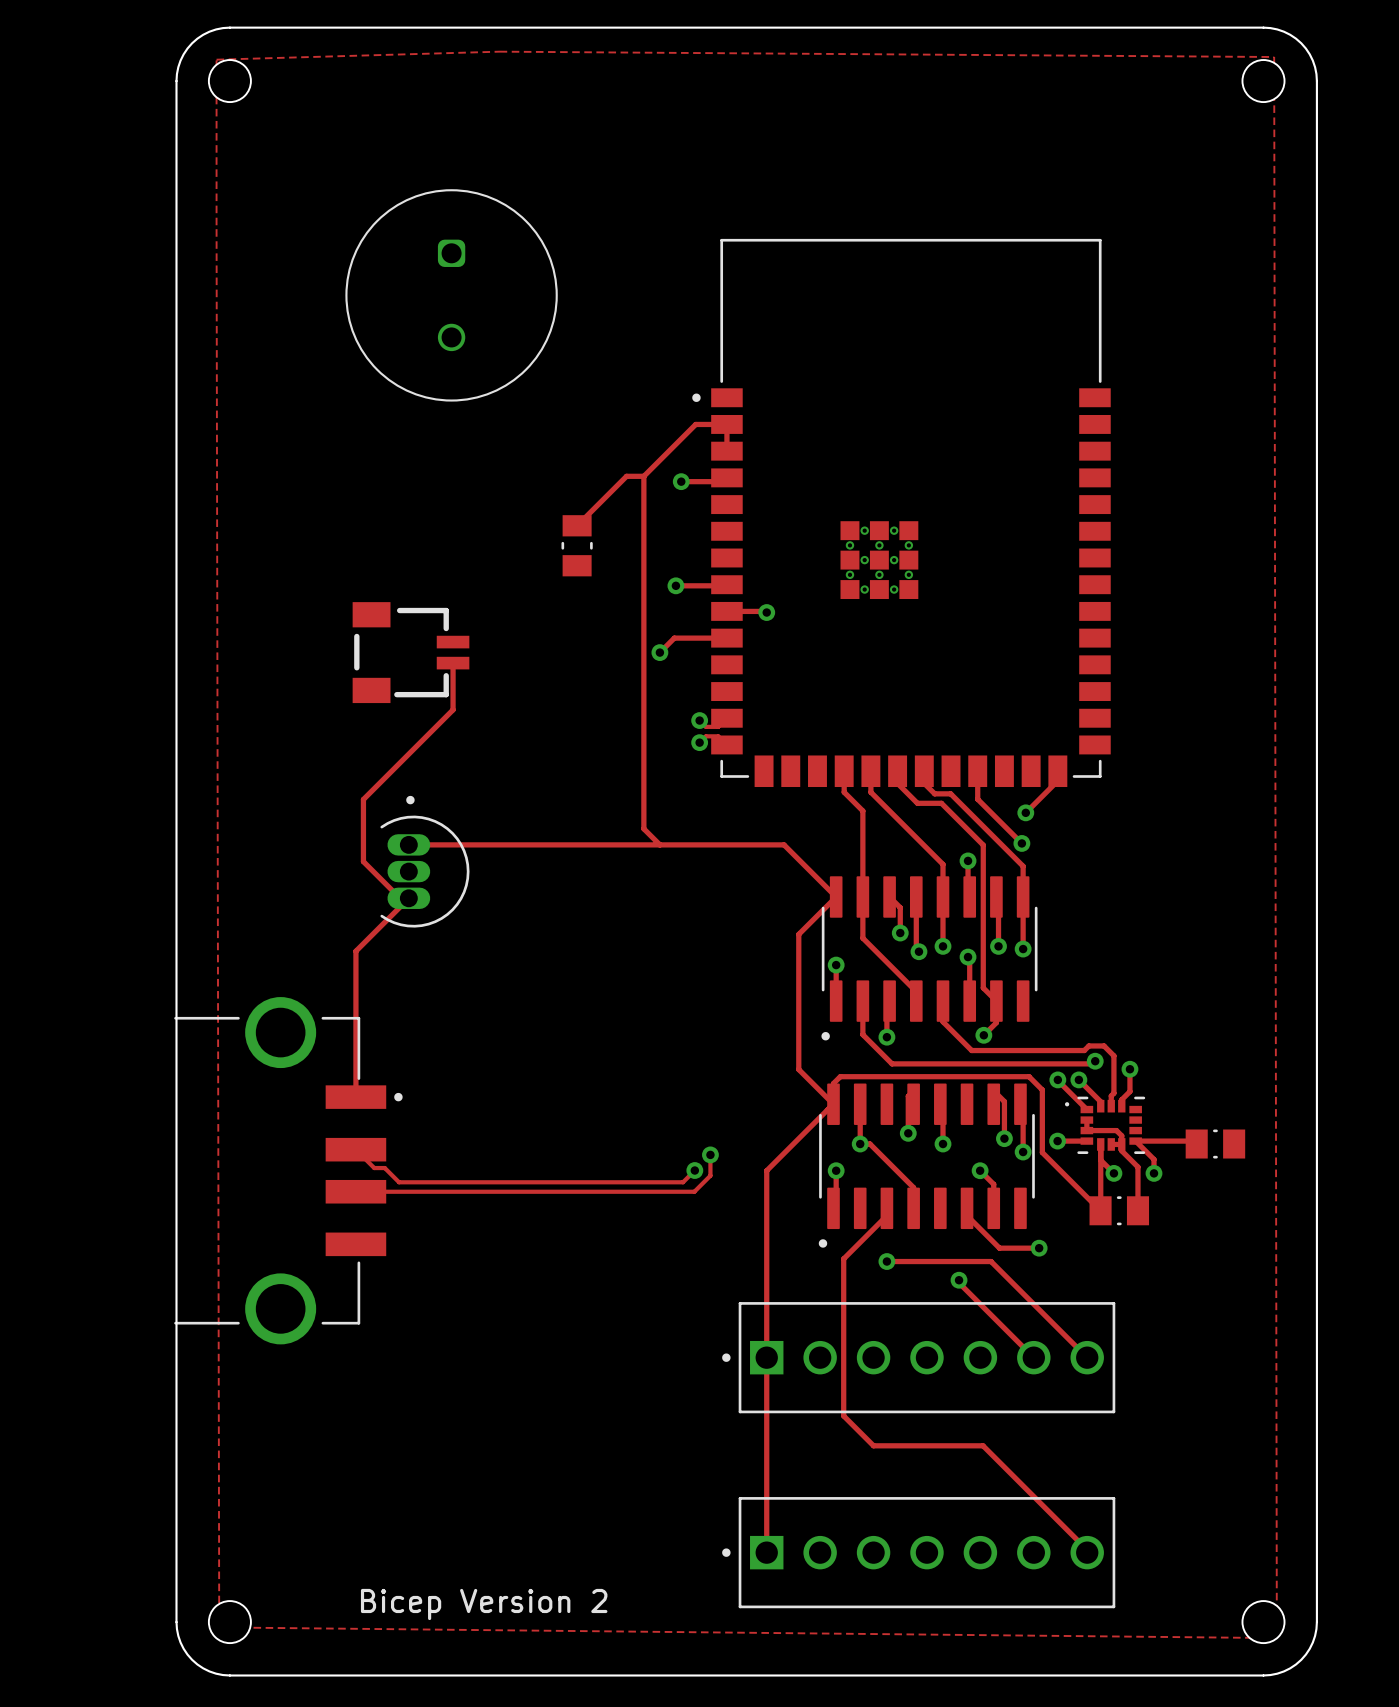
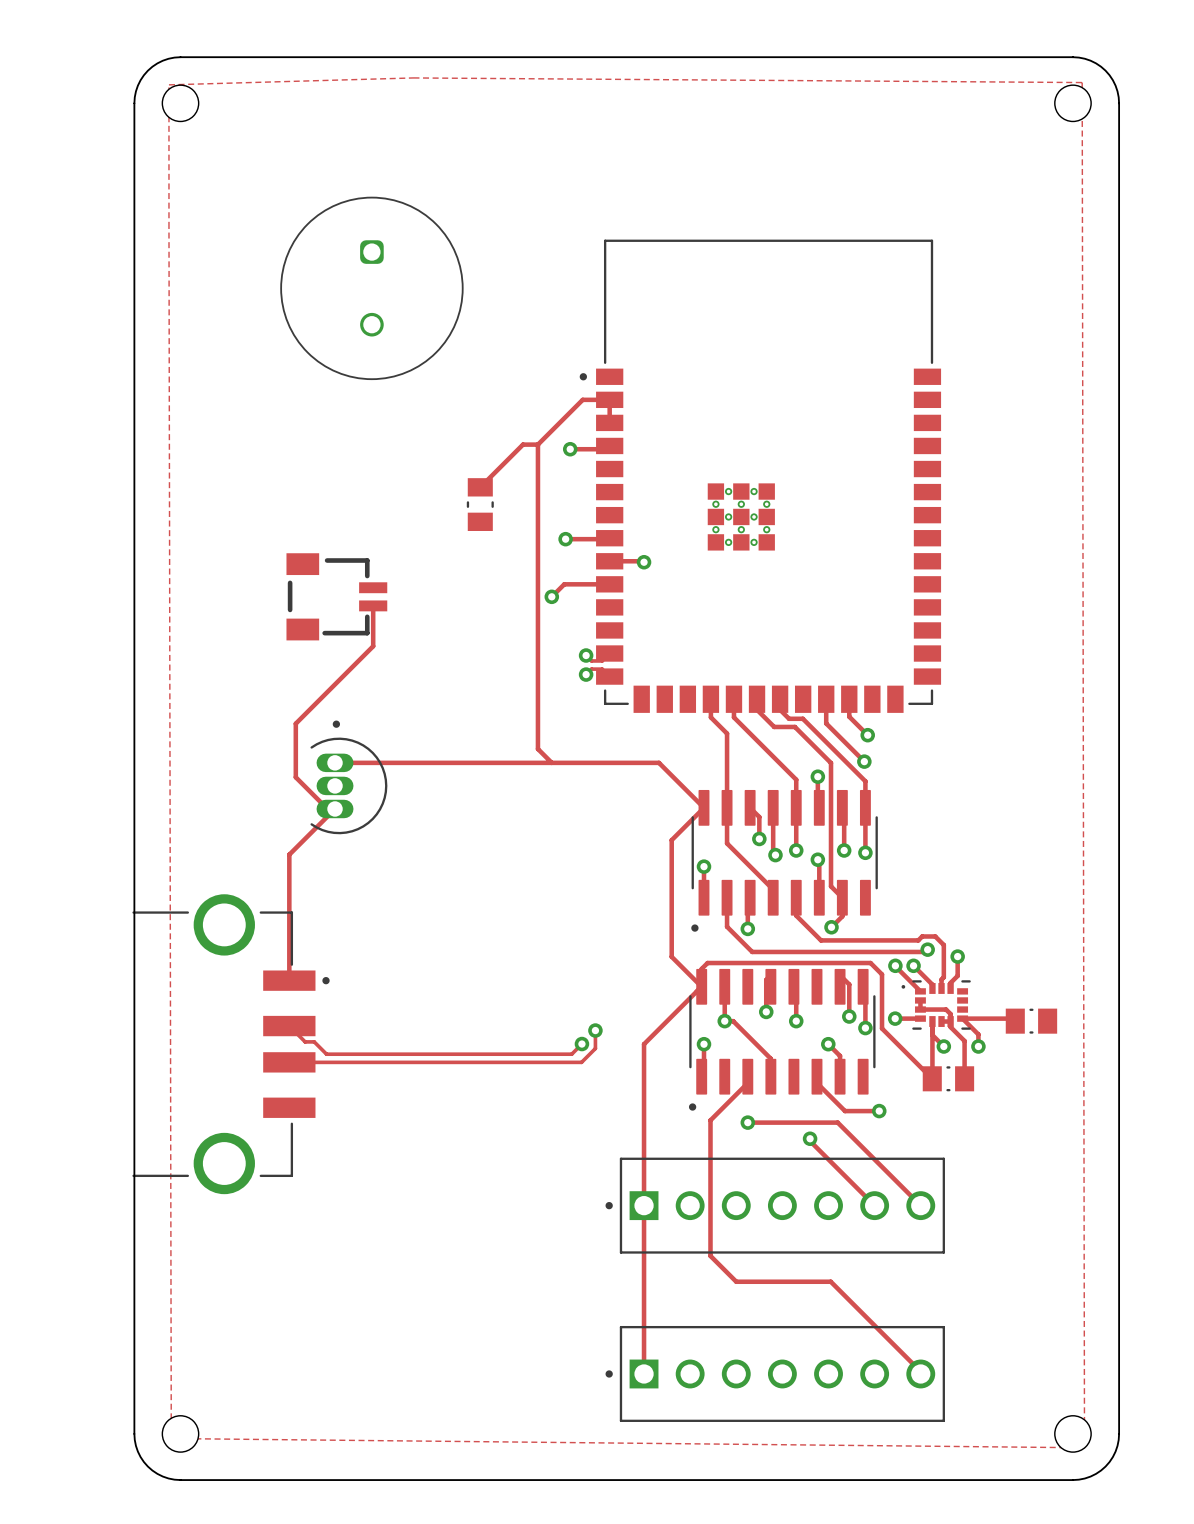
track: (1057, 771) (1057, 780) (1025, 812) -> (849, 699) (849, 716) (867, 735)
text: Bicep Version 2 (484, 1604) -> none

